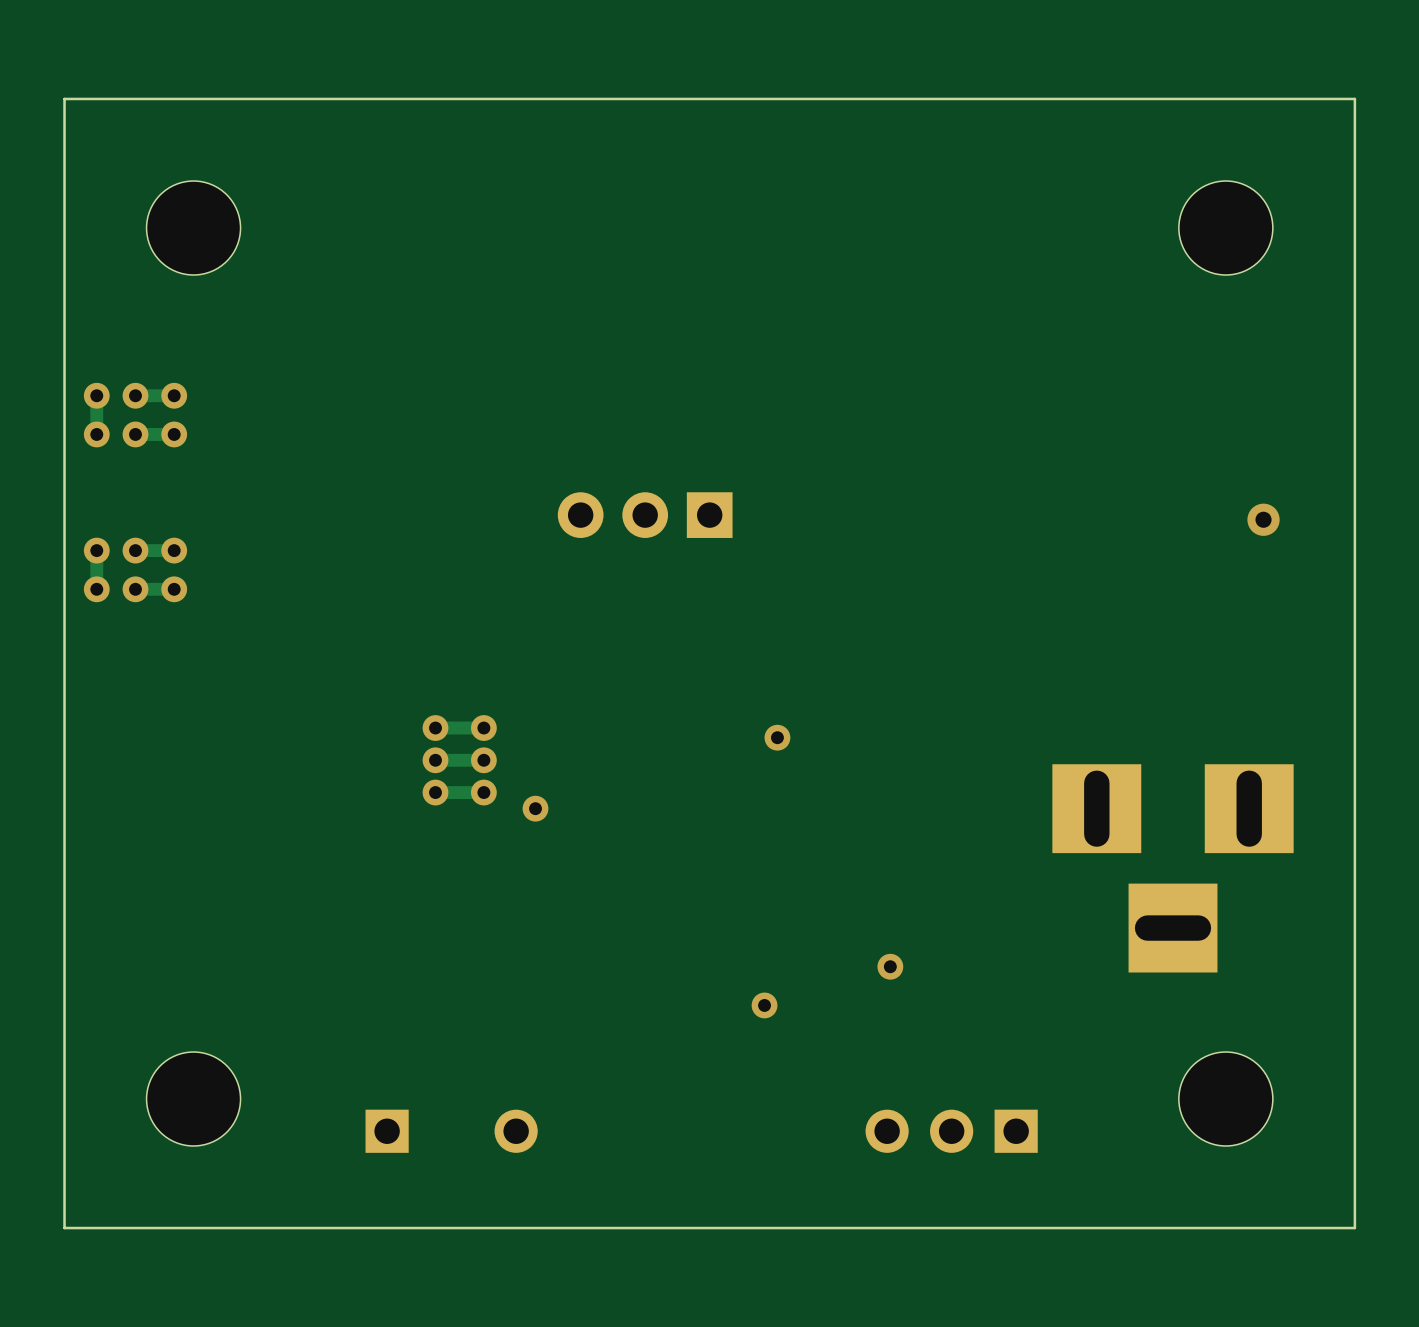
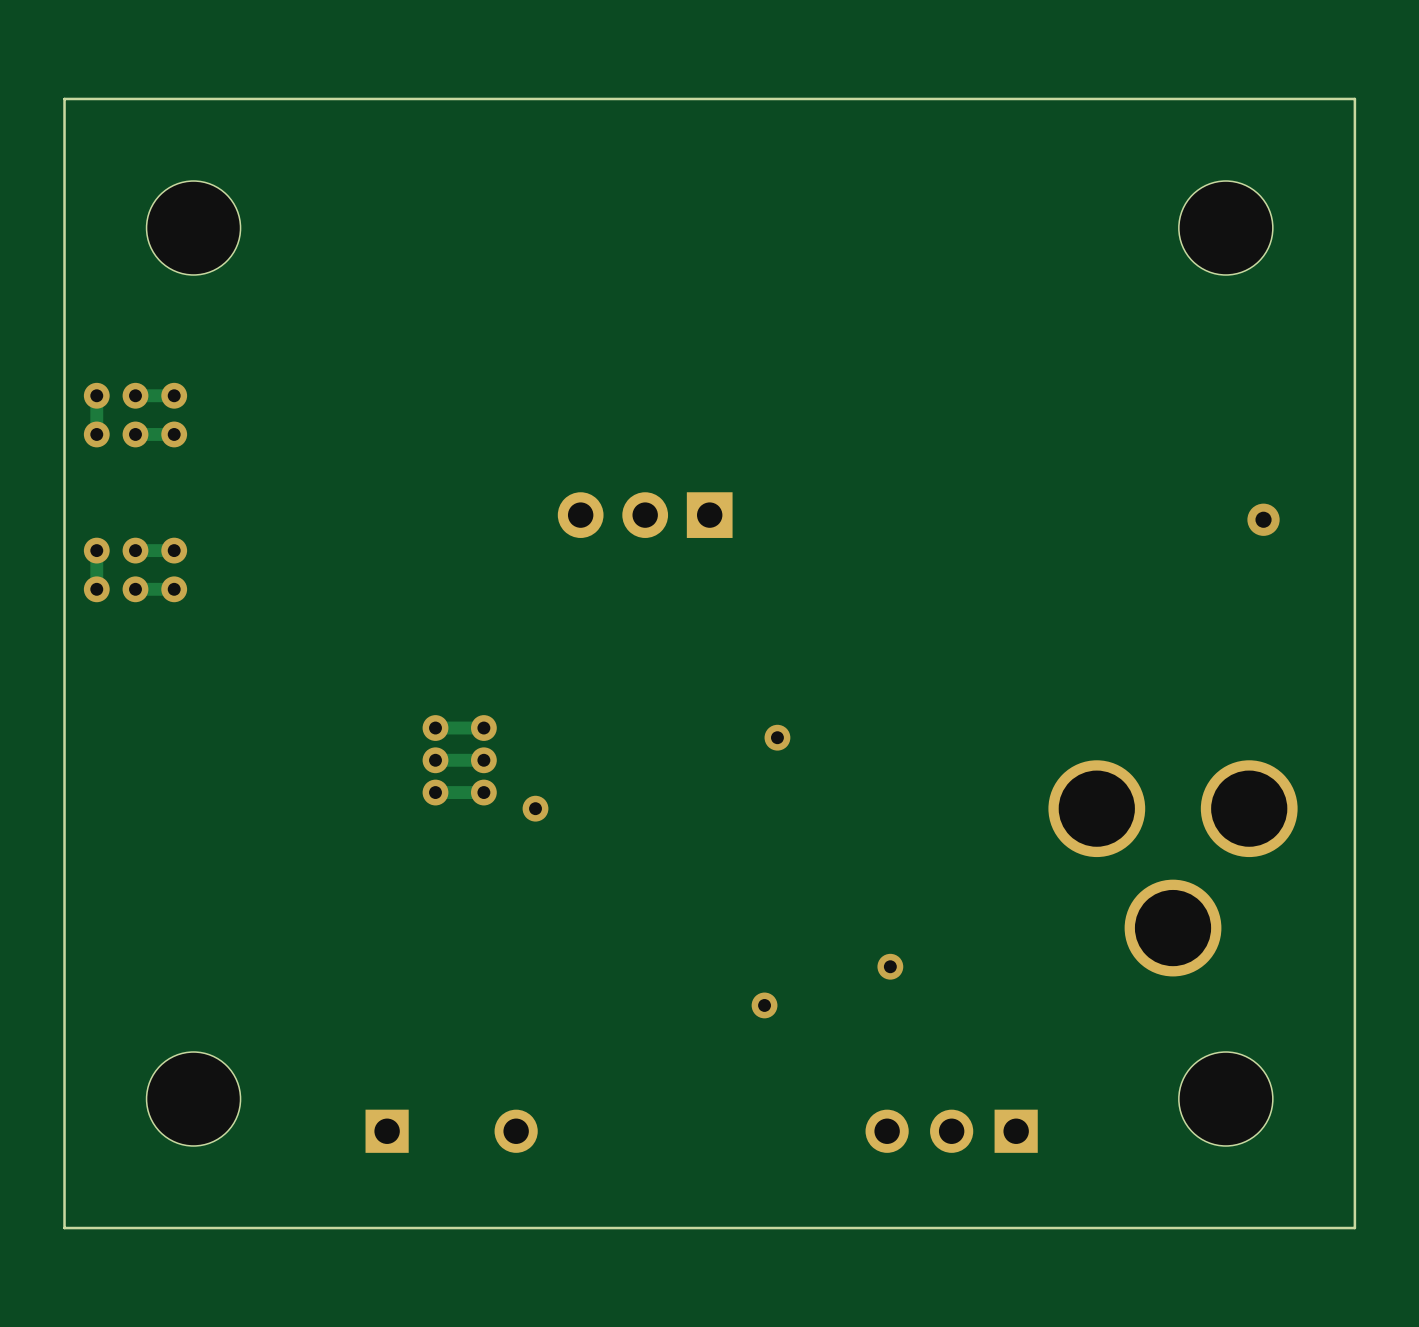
part footprint: [1052, 764, 1294, 973] -> [1048, 760, 1298, 977]

